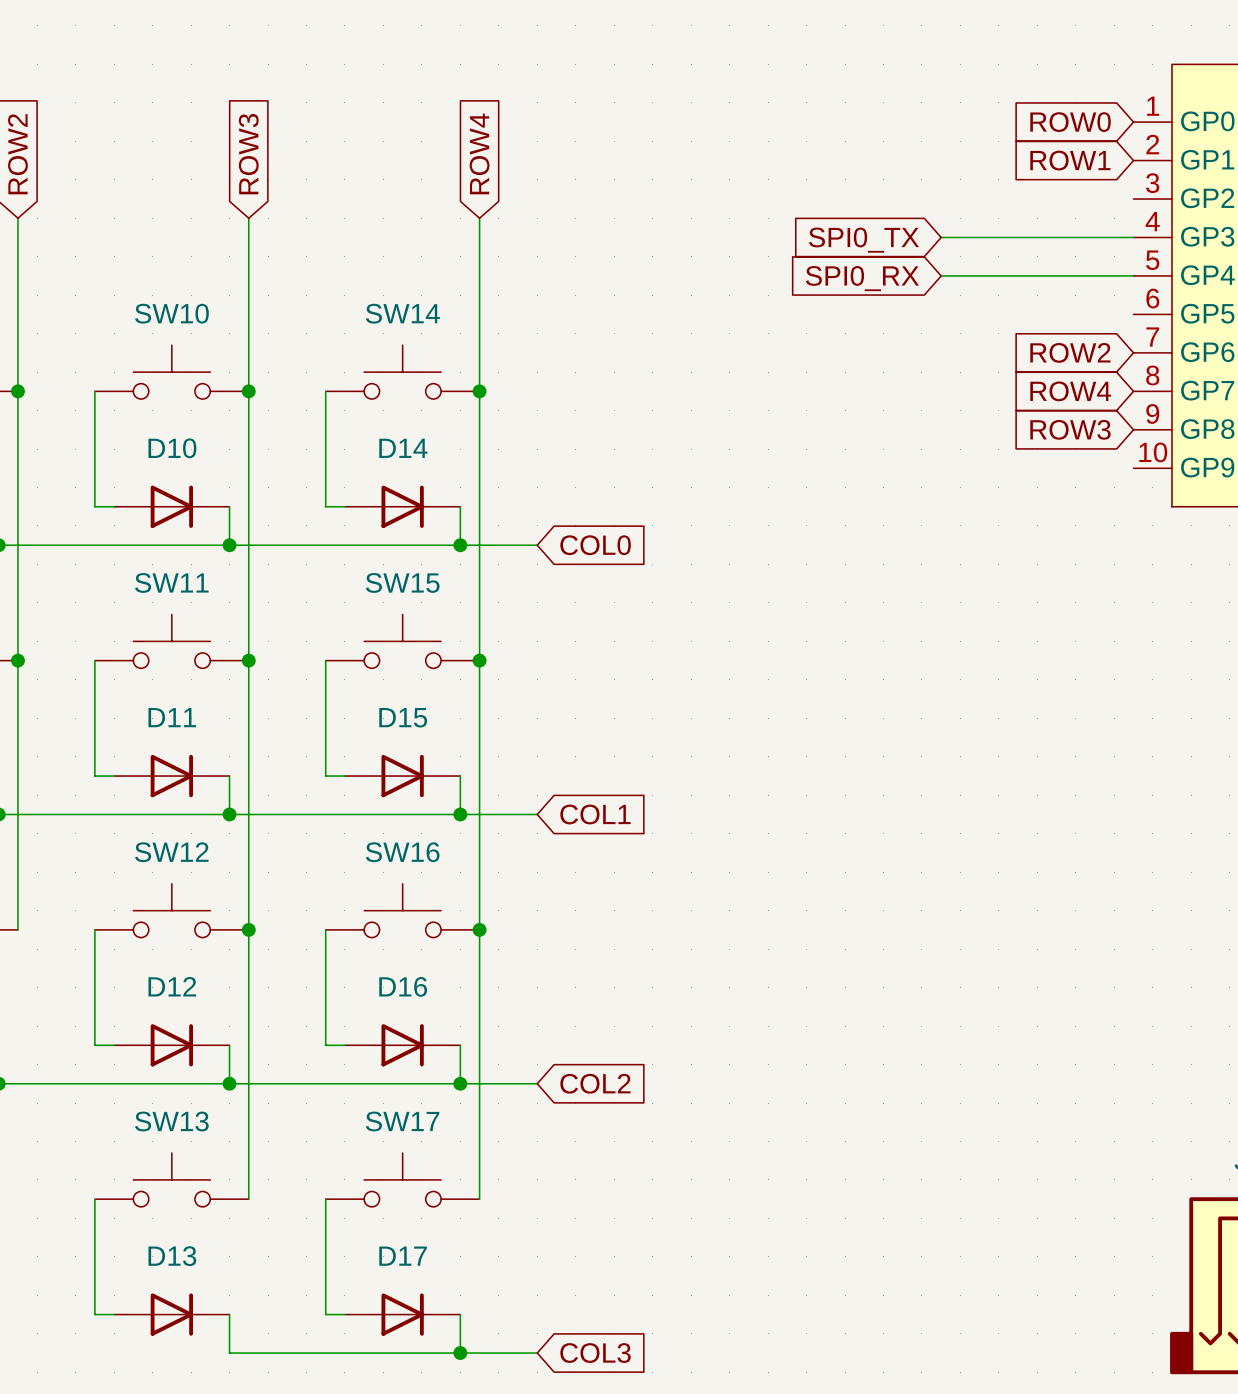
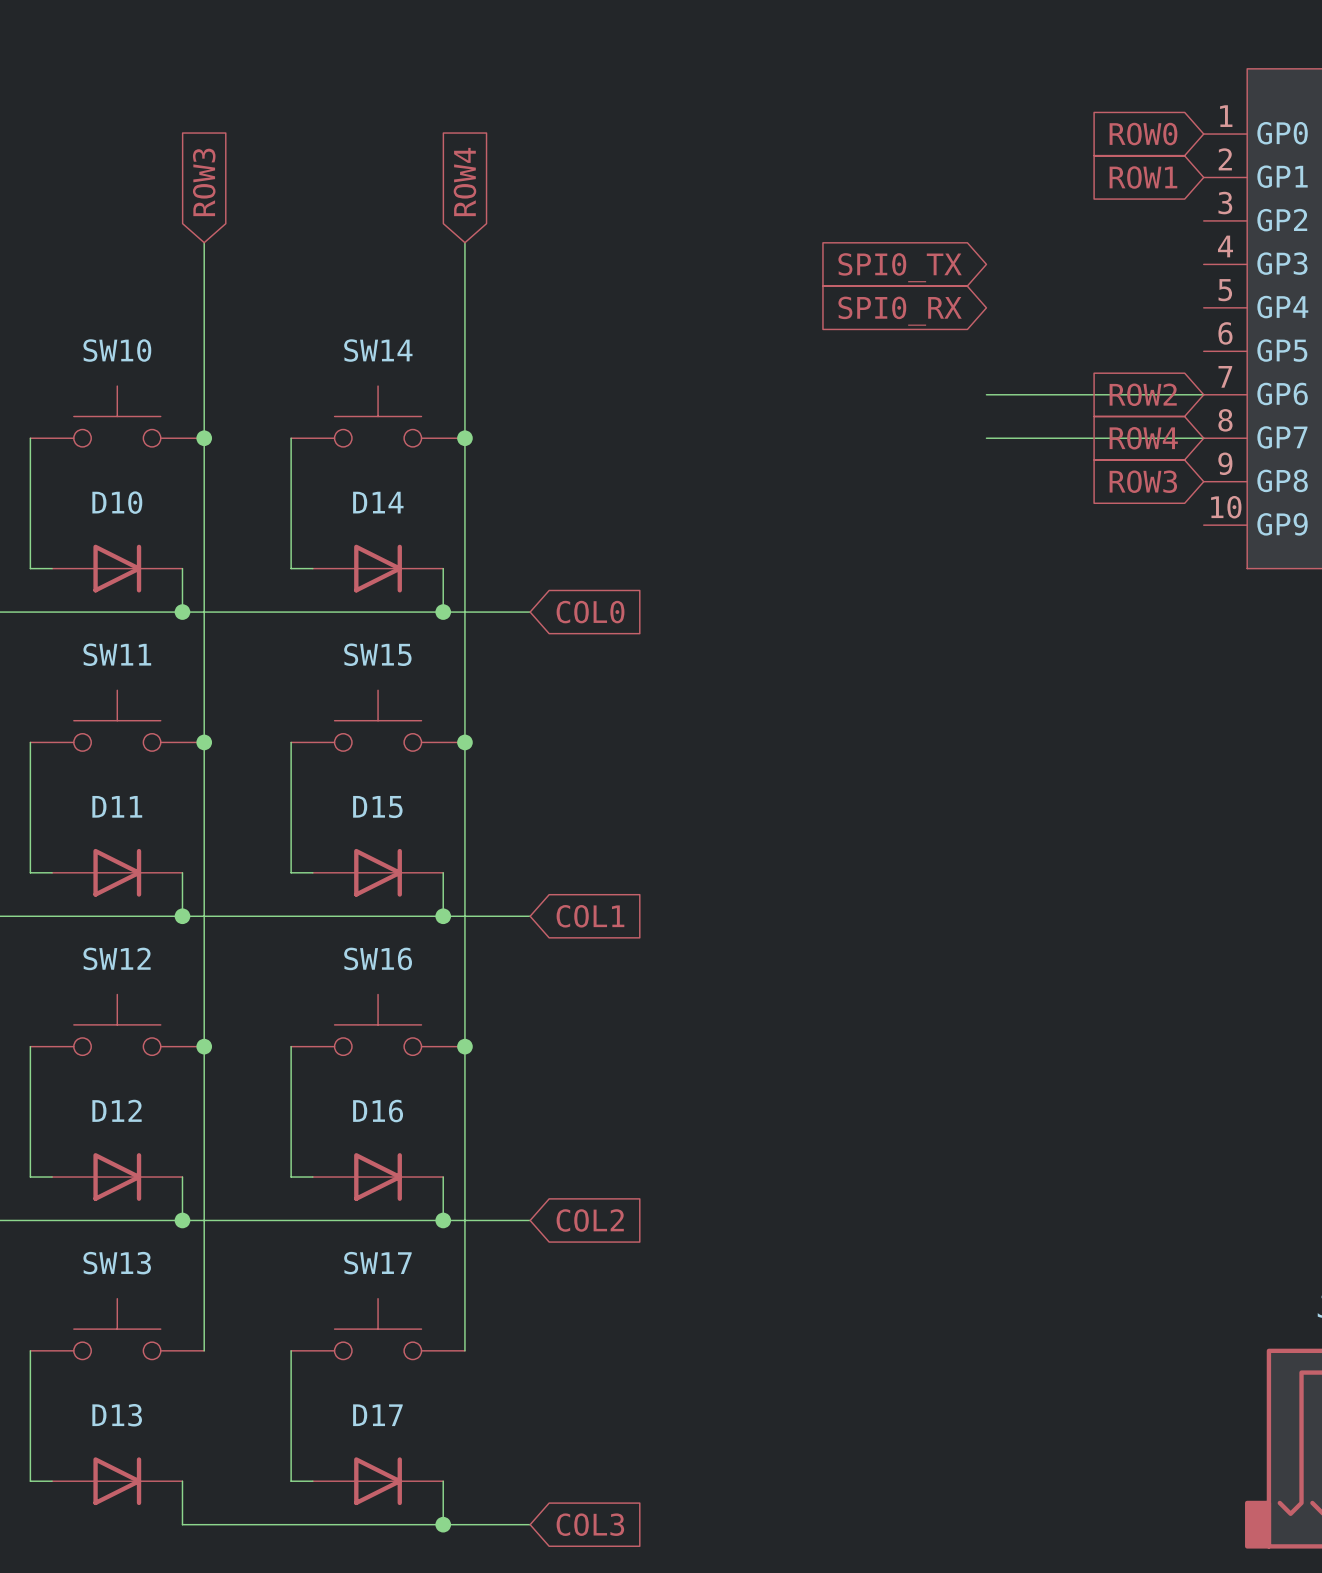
wire: (941, 237) (1133, 237) -> (986, 394) (1203, 394)
wire: (941, 275) (1133, 275) -> (986, 438) (1203, 438)

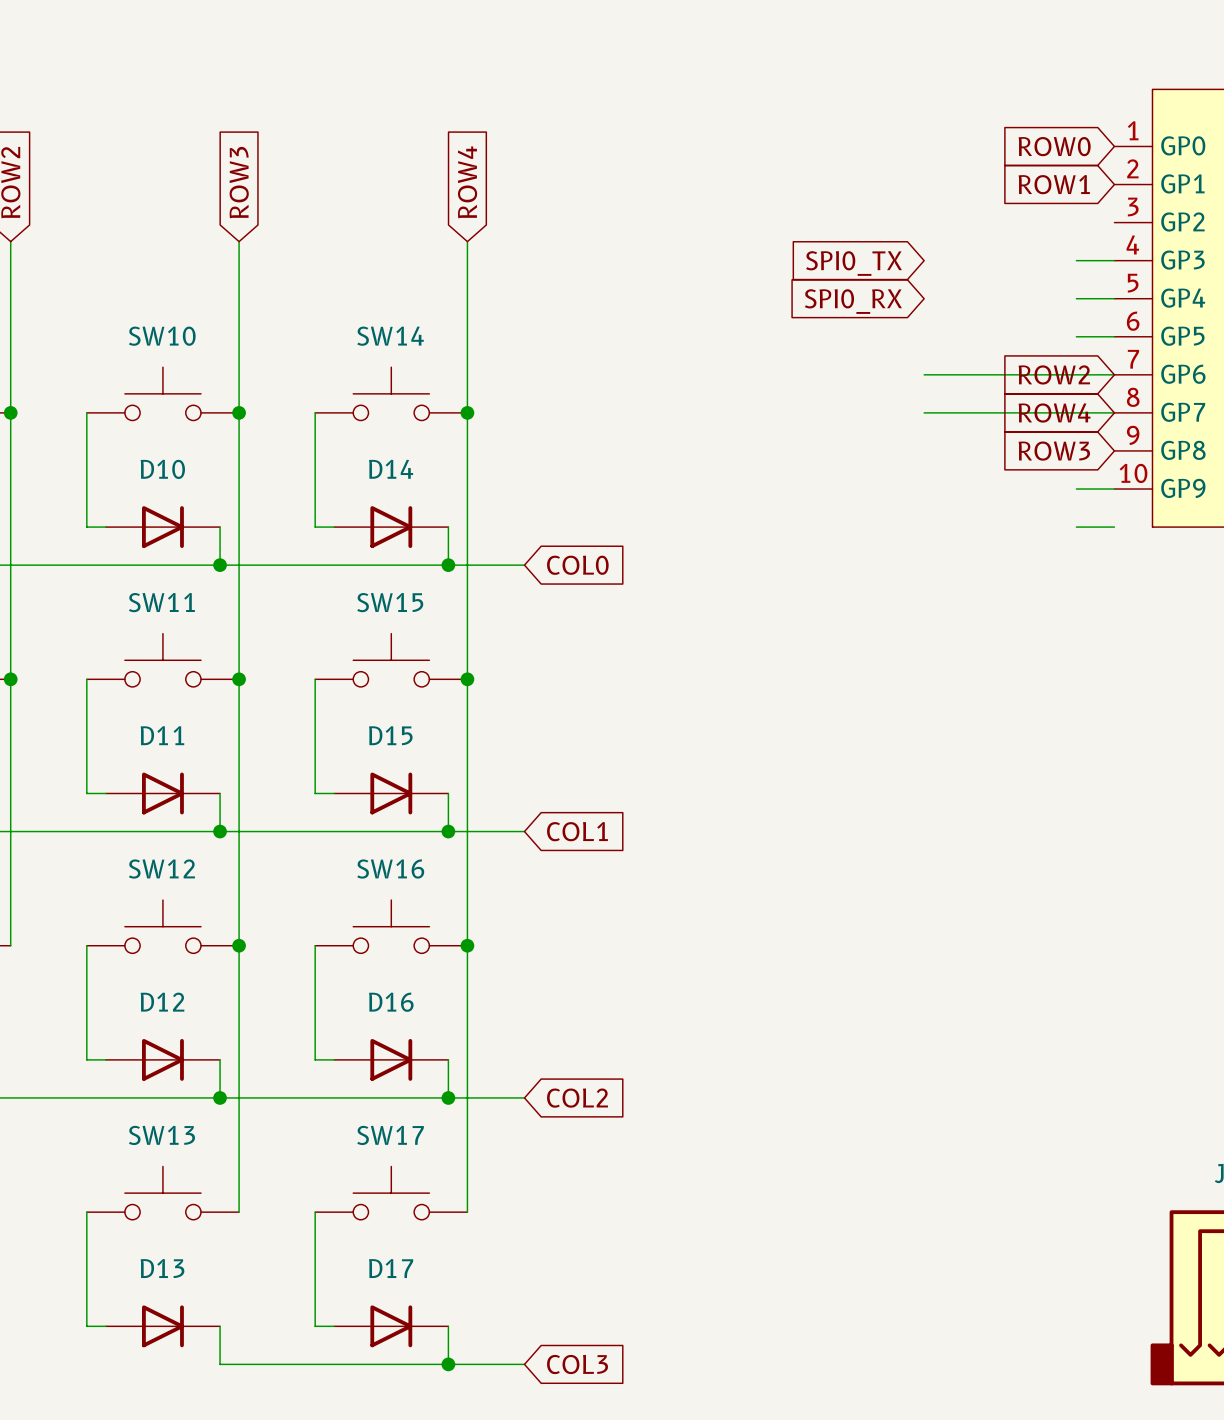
wire: none -> (1076, 260) (1114, 260)
wire: none -> (1076, 298) (1114, 298)
wire: none -> (1076, 336) (1114, 336)
wire: none -> (1076, 489) (1114, 489)
wire: none -> (1076, 527) (1114, 527)

